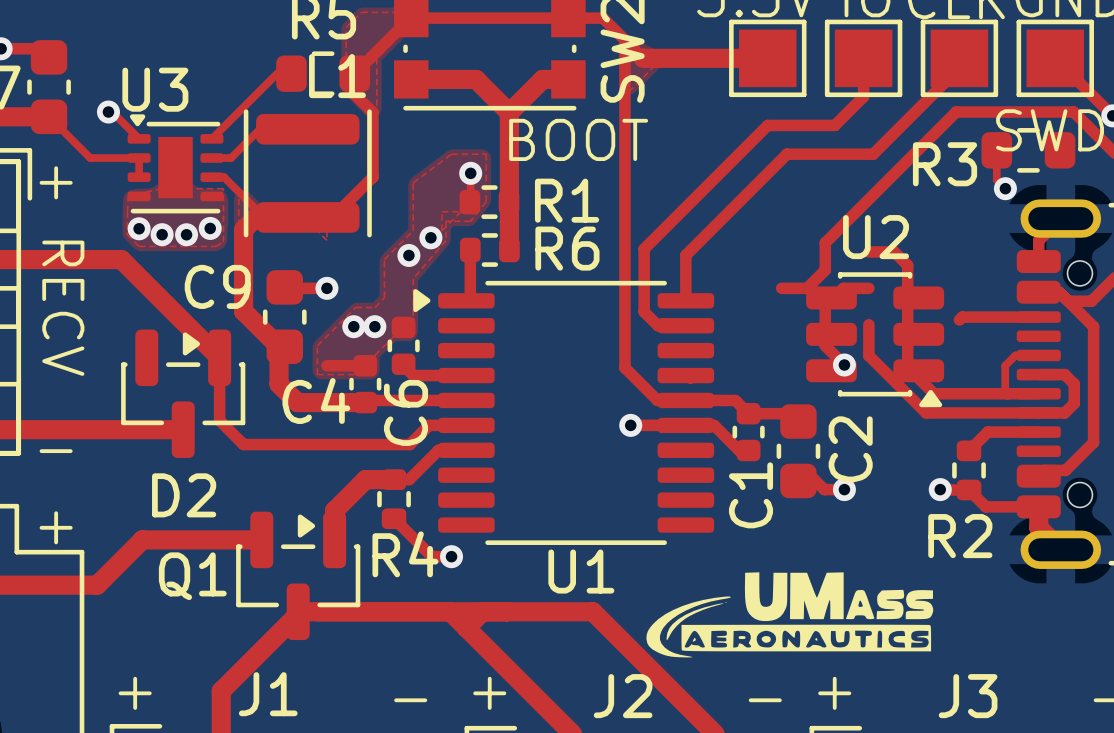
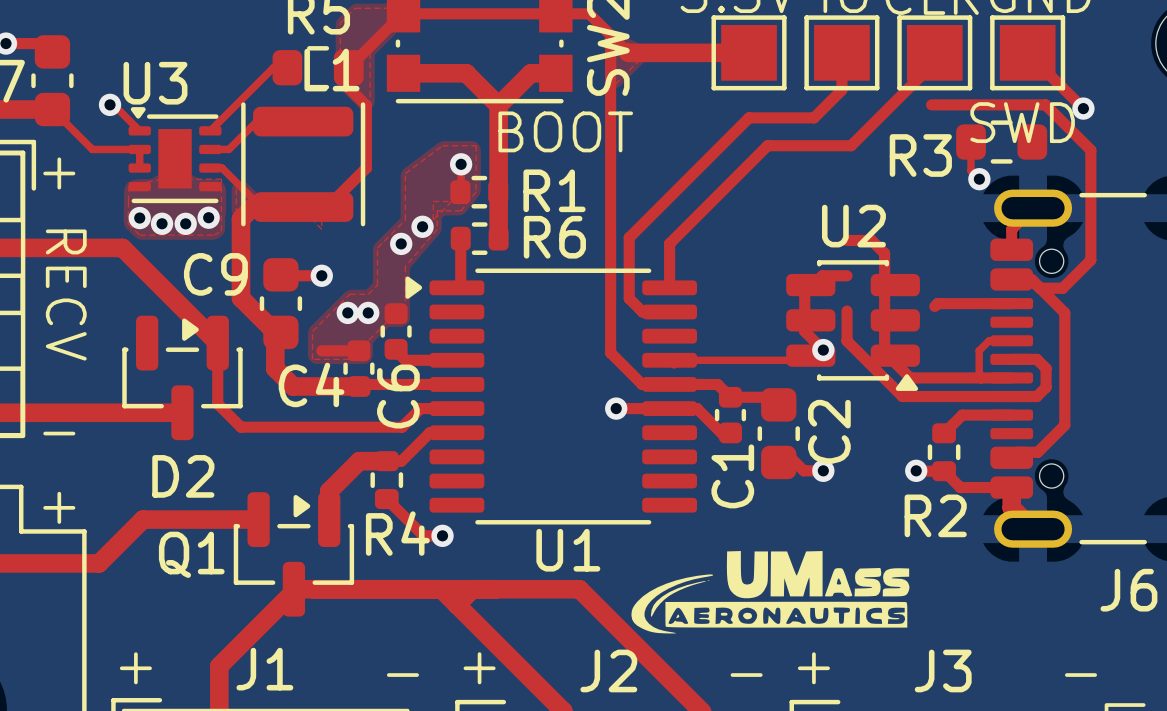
top track: (956, 112) (825, 242) (825, 270) (807, 288) (781, 288) -> none
top track: none -> (669, 360) (802, 360) (804, 362)

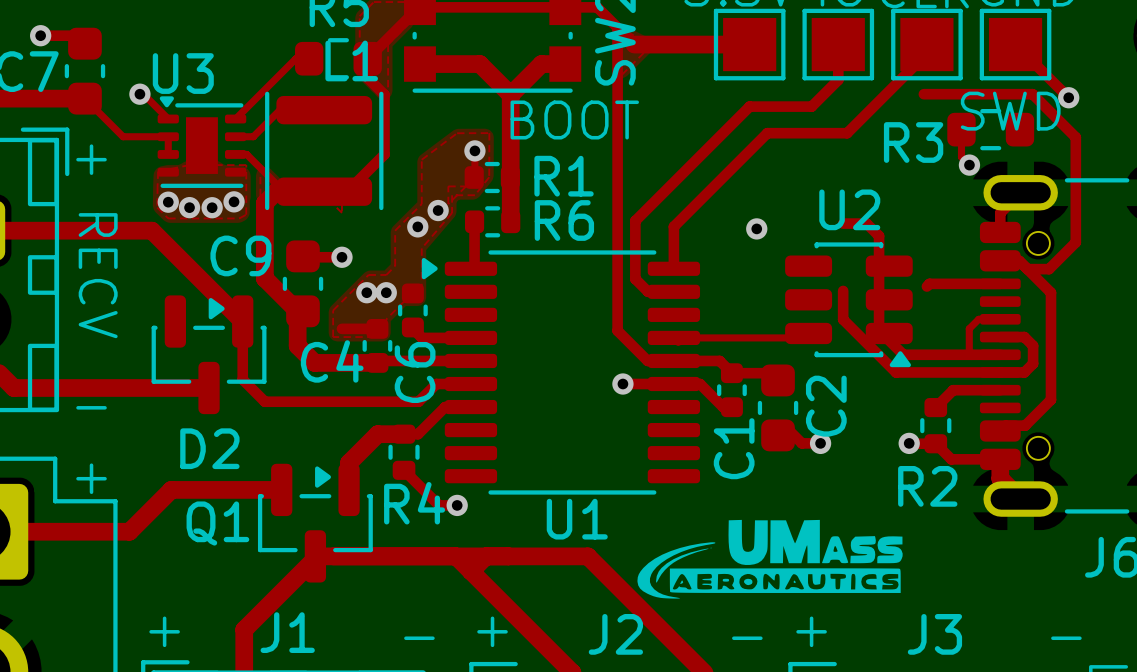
top track: (847, 275) (822, 275) (804, 293) (804, 331) (823, 350) -> none
via position: (823, 350) -> (756, 228)

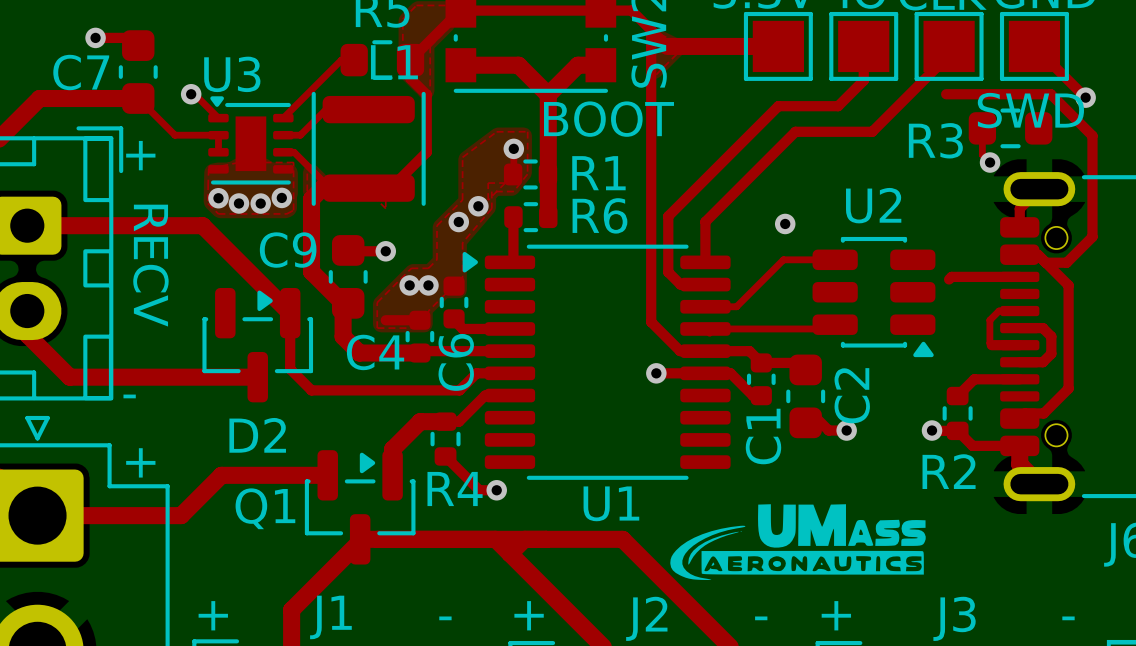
top track: (843, 223) (866, 223) (879, 236) (879, 330) (903, 354) (971, 354) -> none
top track: none -> (835, 259) (783, 259) (736, 306) (705, 306)
top track: (843, 290) (843, 319) (896, 372) (1000, 372) -> none

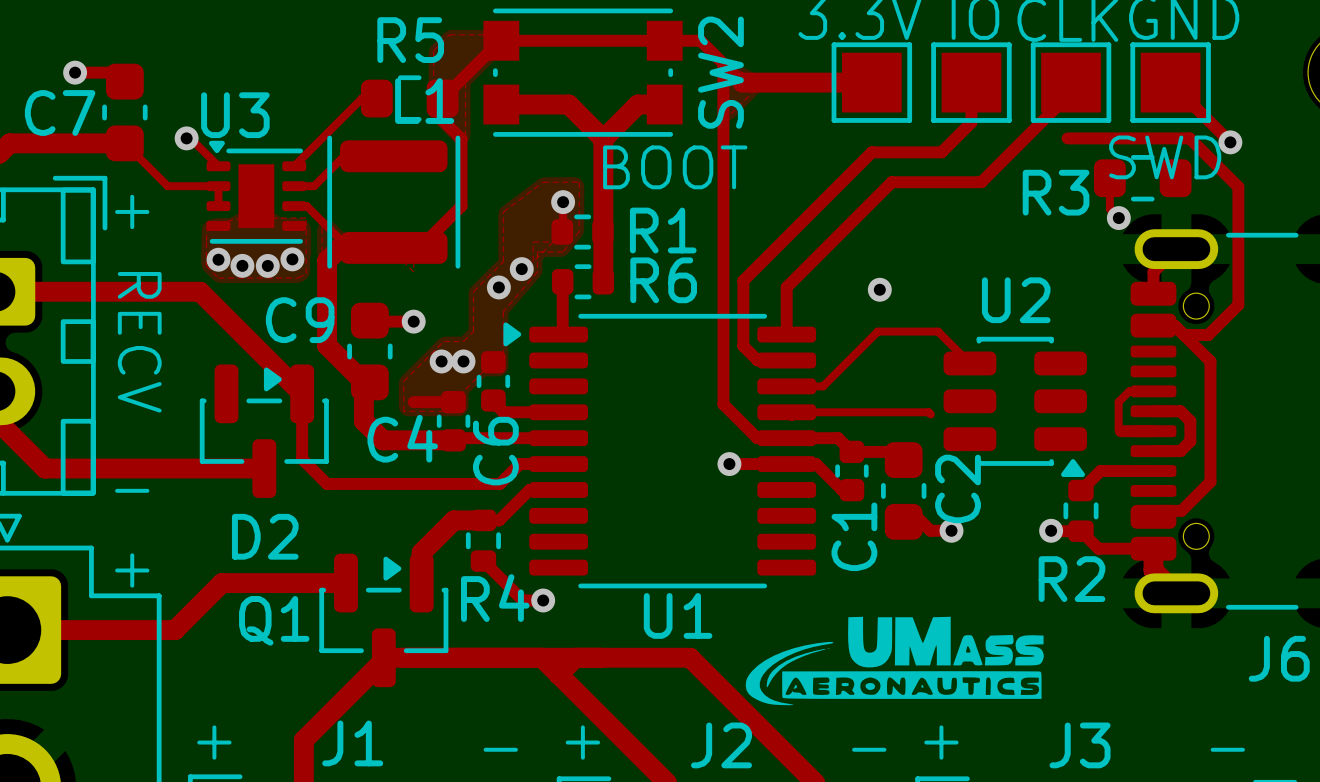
top track: none -> (938, 331) (969, 363)
top track: (1019, 276) (951, 276) (949, 279) -> none
U2 position: (873, 297) -> (1015, 406)

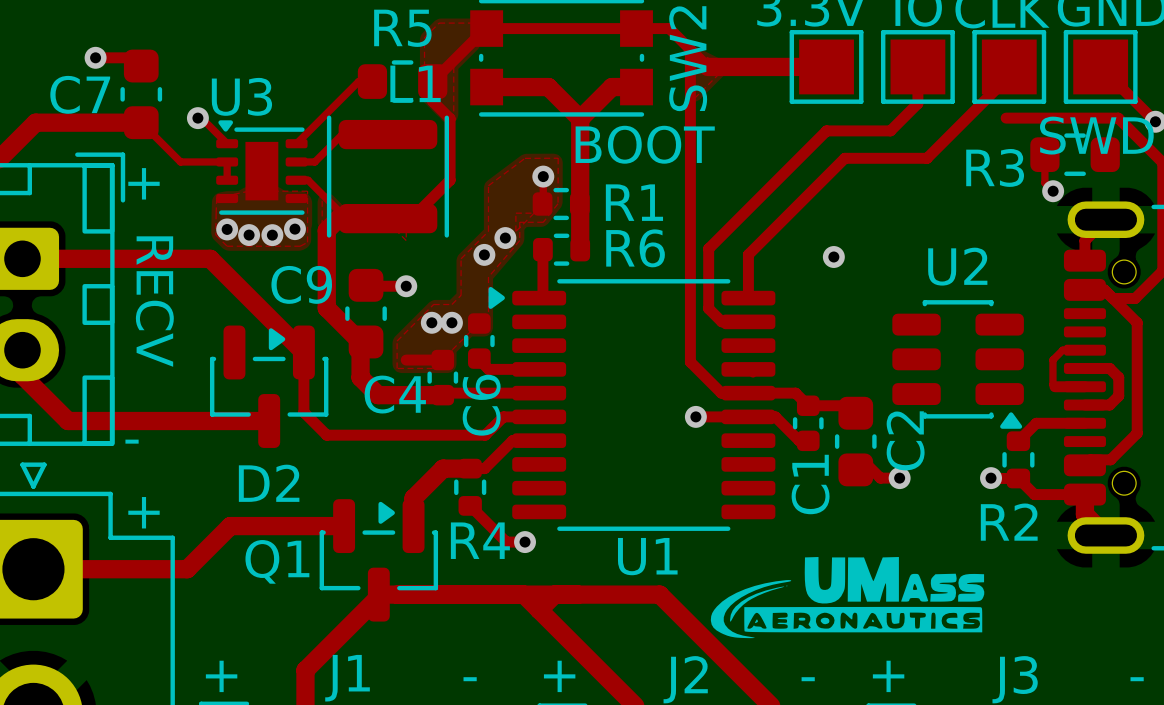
top track: (969, 363) (938, 331) (877, 331) (823, 386) (786, 386) -> none
top track: (786, 412) (928, 412) (930, 414) -> none

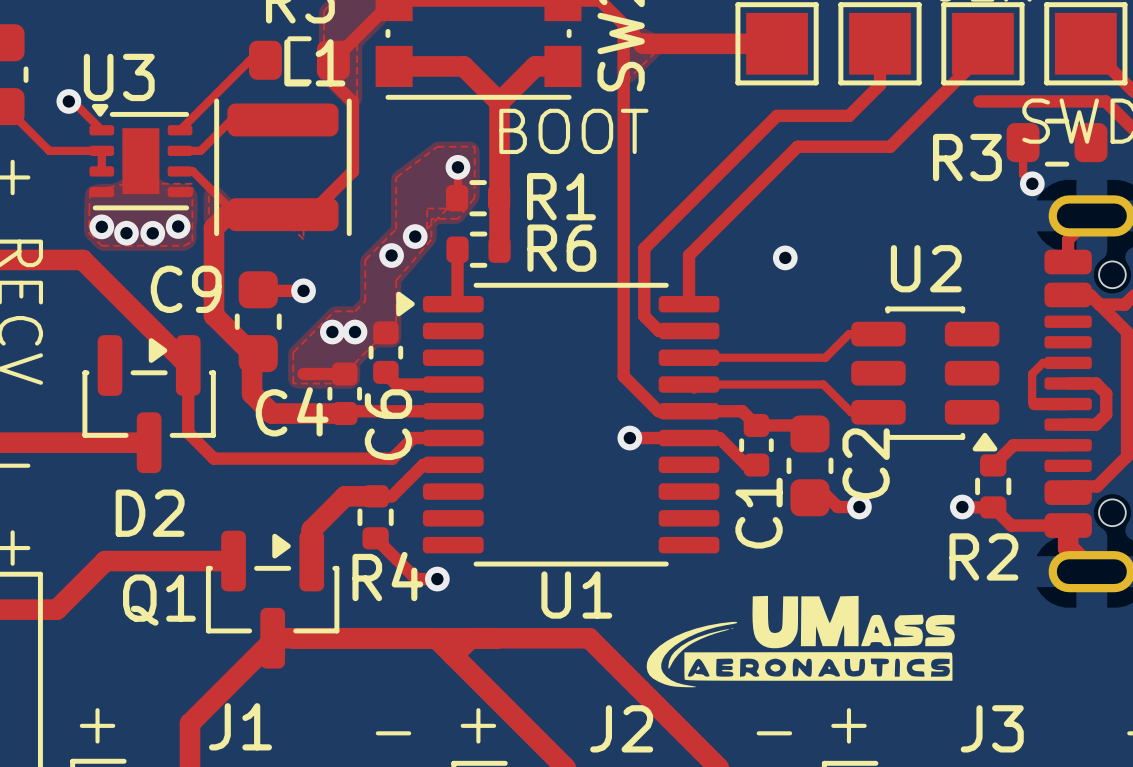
top track: none -> (878, 334) (849, 334) (825, 357) (689, 357)
top track: none -> (689, 384) (823, 384) (851, 412) (878, 412)

